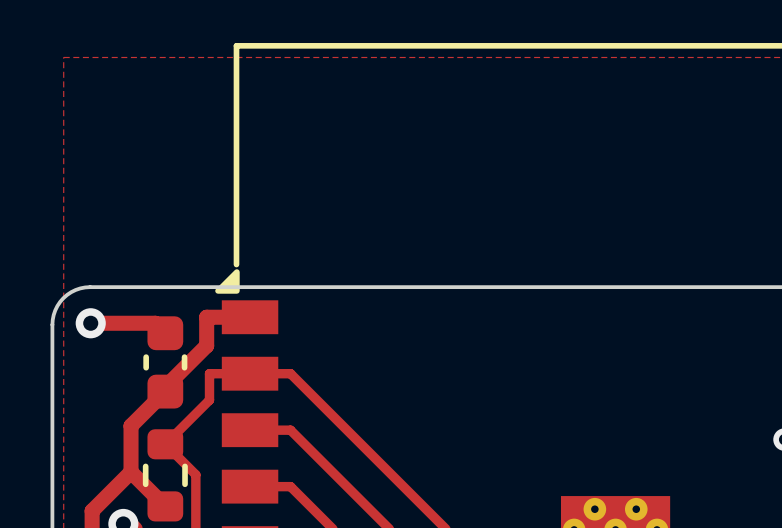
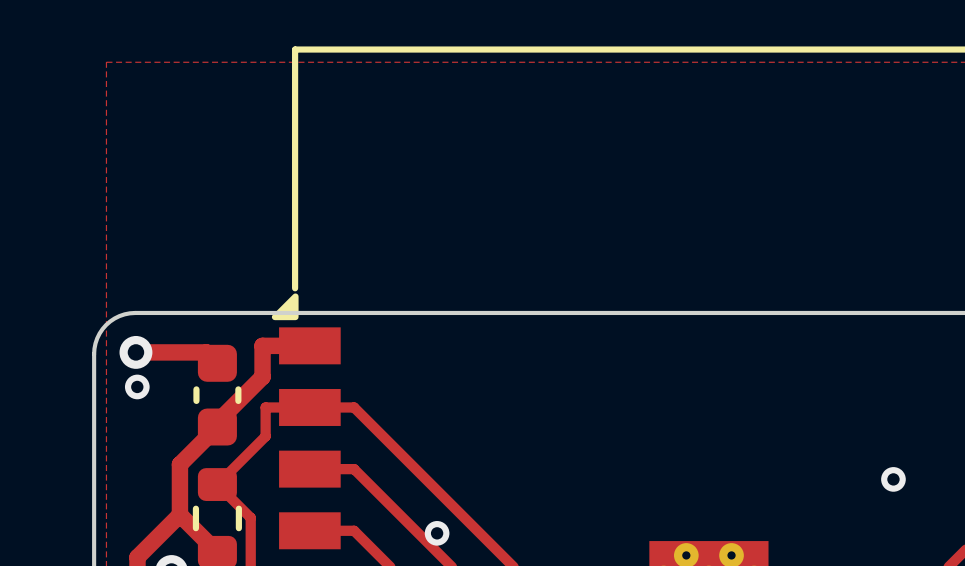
via: none -> (137, 386)
via: none -> (437, 533)

